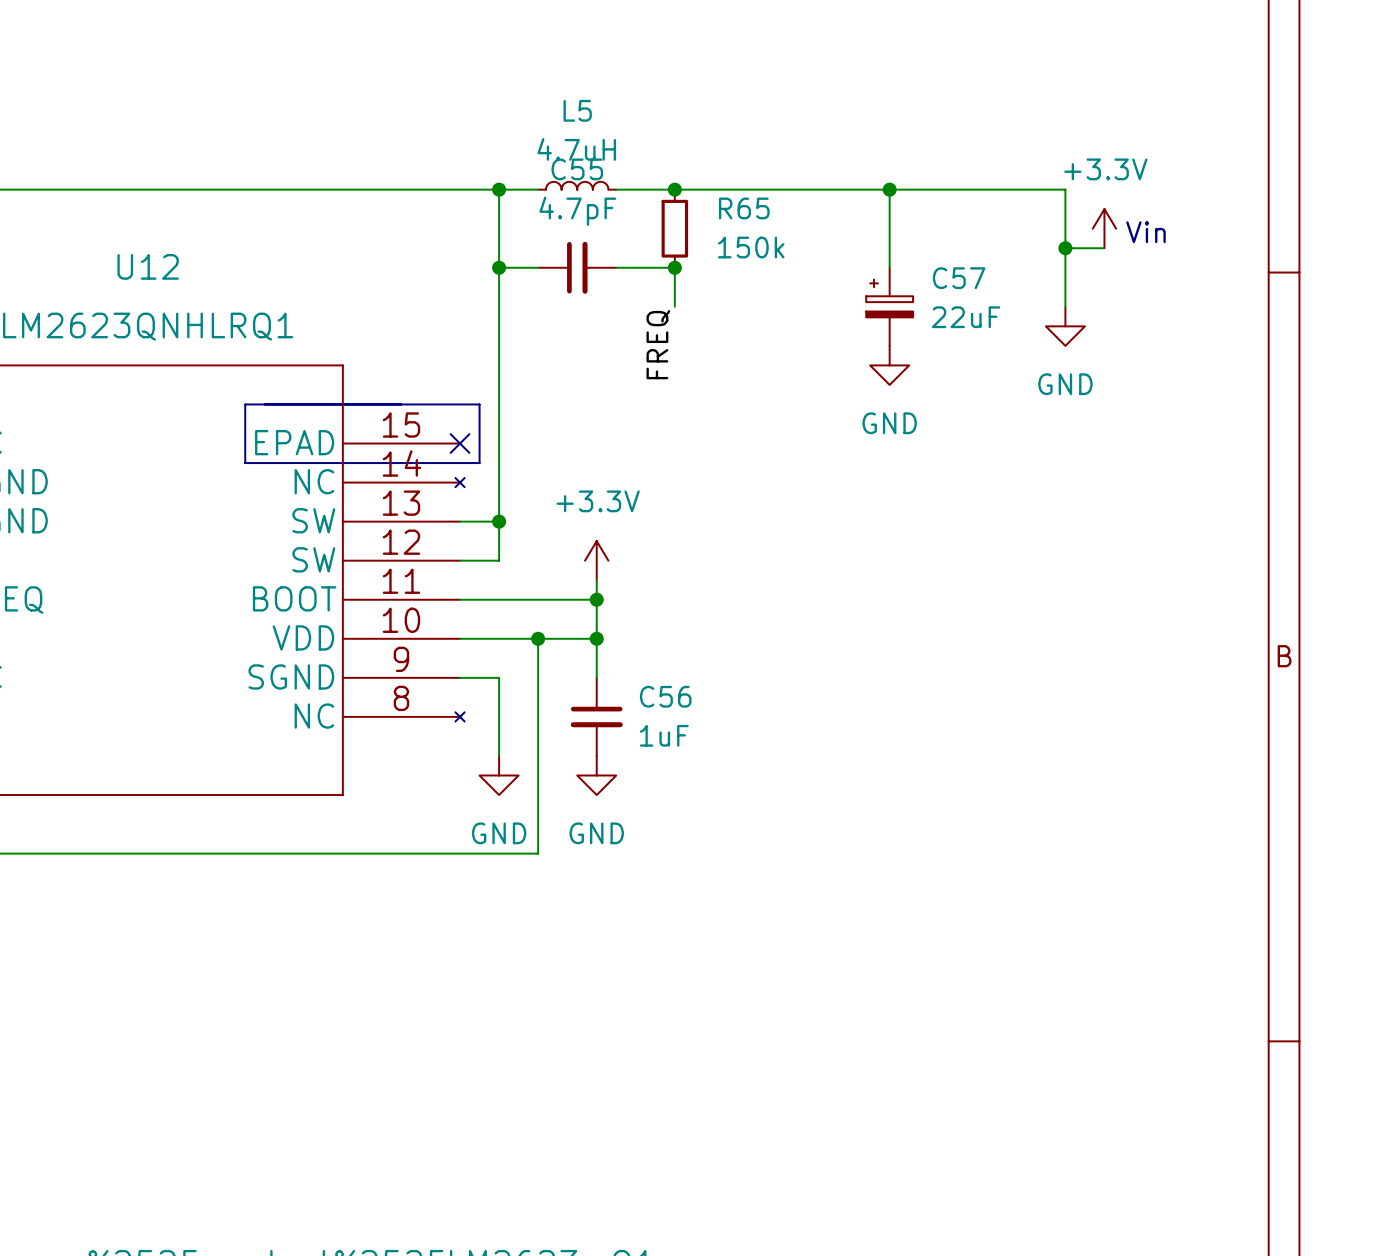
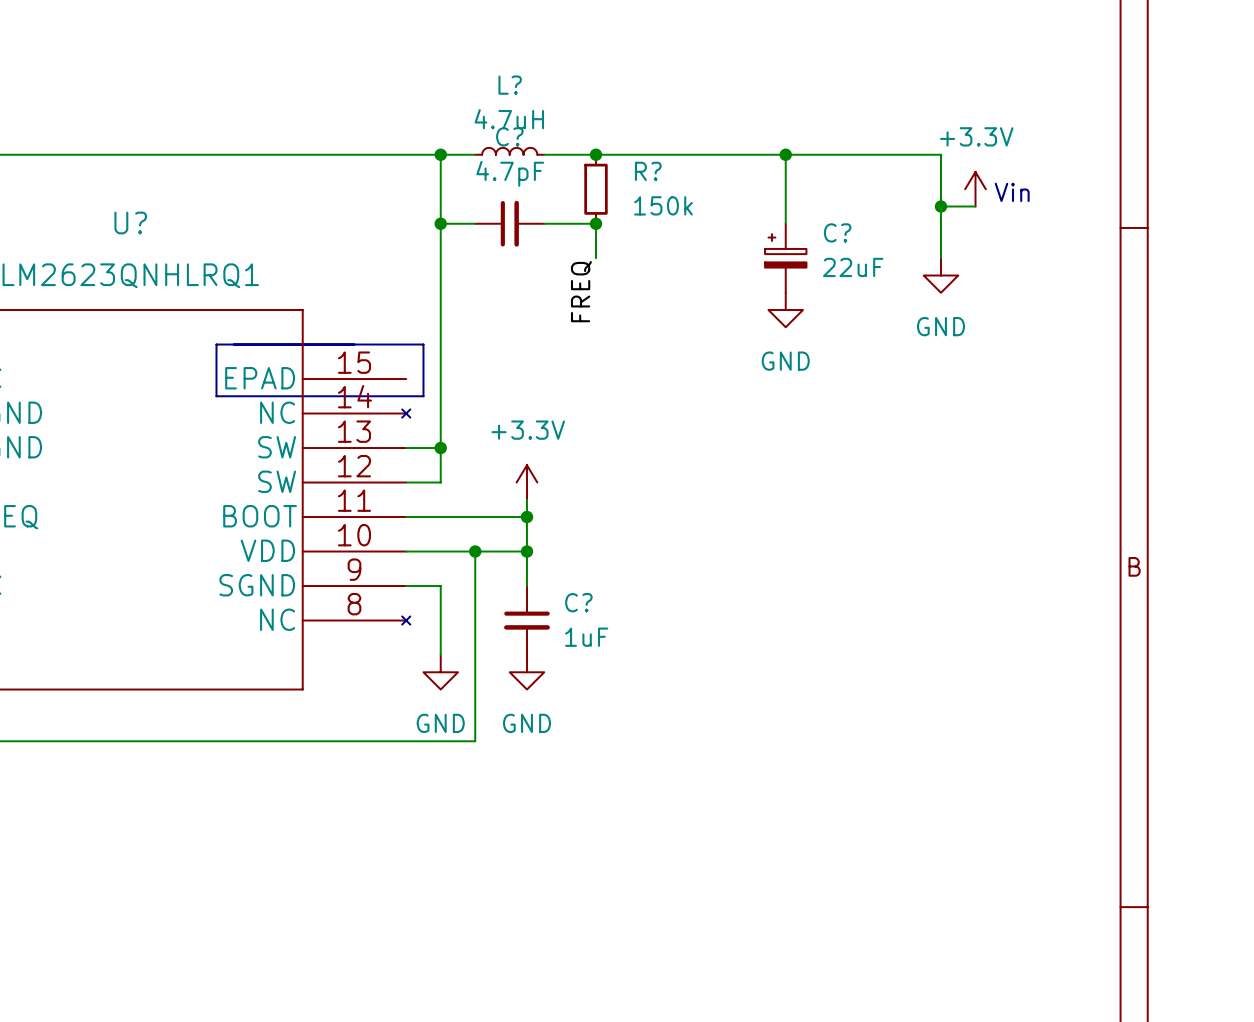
L5 name: L5 (577, 110) -> L? (510, 85)
C55 name: C55 (577, 169) -> C? (509, 136)
R65 name: R65 (744, 208) -> R? (648, 171)
U12 name: U12 (148, 266) -> U? (130, 222)
C57 name: C57 (959, 278) -> C? (837, 232)
no-connect mark: (460, 443) -> none
C56 name: C56 (665, 696) -> C? (578, 602)

